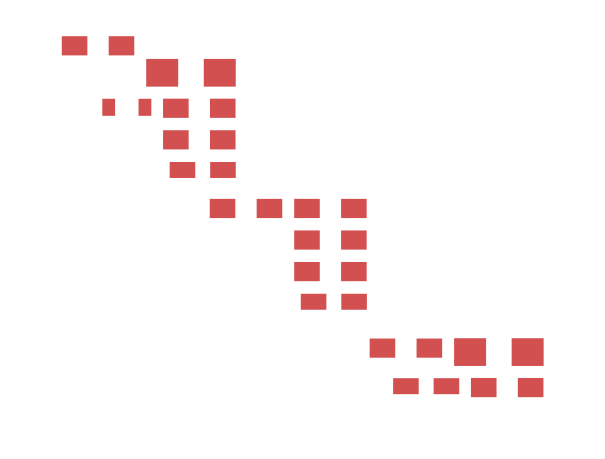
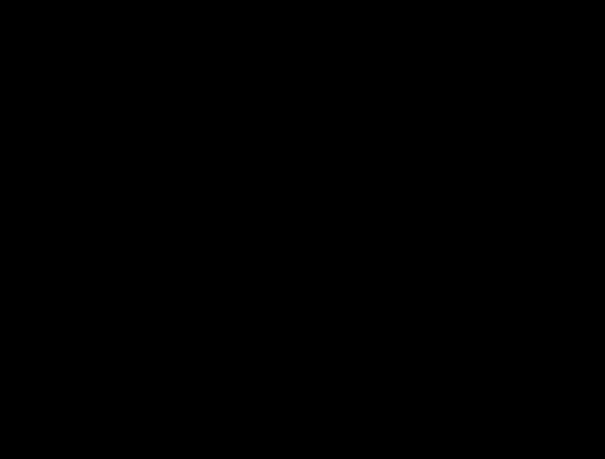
part: (98, 45) -> none
part: (190, 72) -> none
part: (126, 107) -> none
part: (199, 108) -> none
part: (199, 139) -> none
part: (202, 169) -> none
part: (245, 208) -> none
part: (330, 208) -> none
part: (330, 240) -> none
part: (330, 271) -> none
part: (333, 301) -> none
part: (405, 348) -> none
part: (498, 352) -> none
part: (426, 386) -> none
part: (507, 387) -> none

